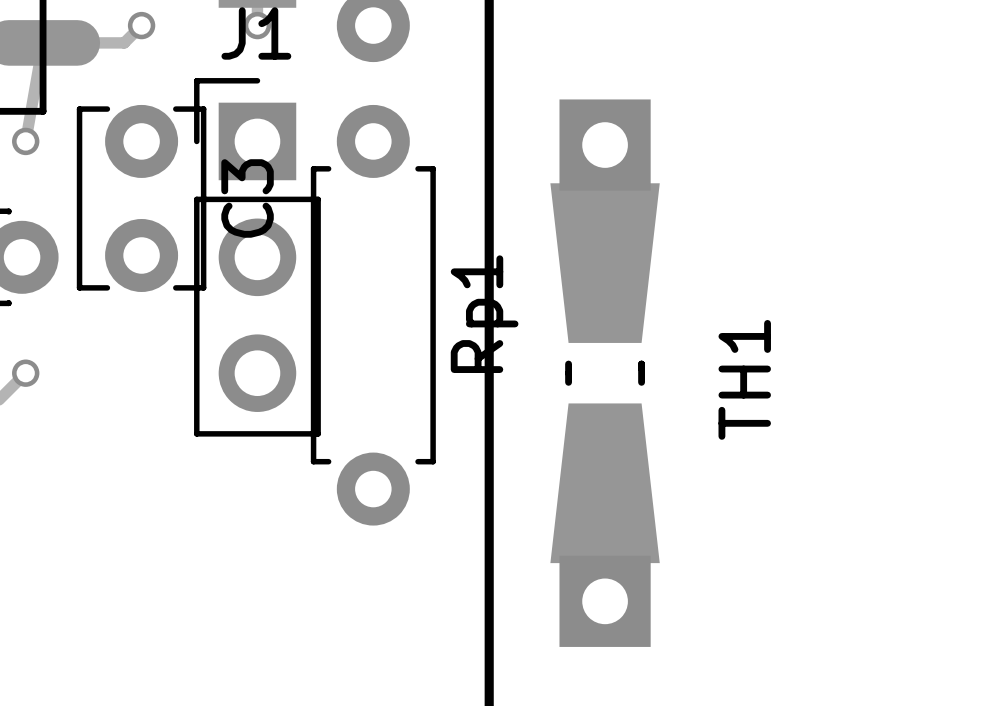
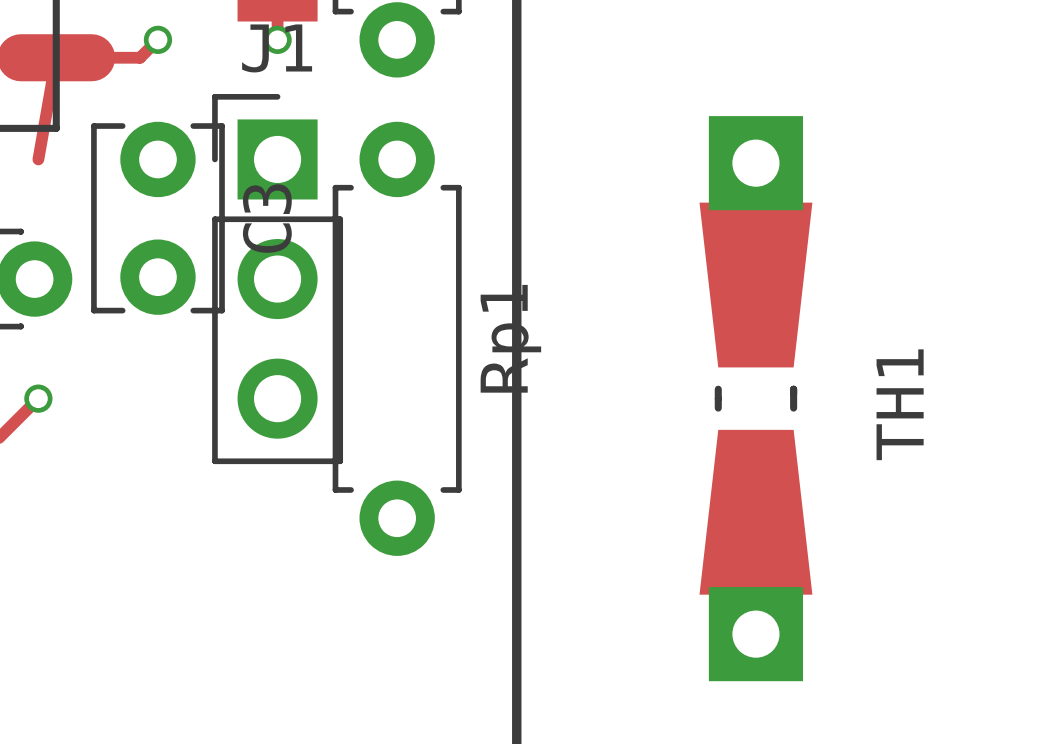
via: (25, 141) -> none
TH1 position: (605, 373) -> (755, 398)

